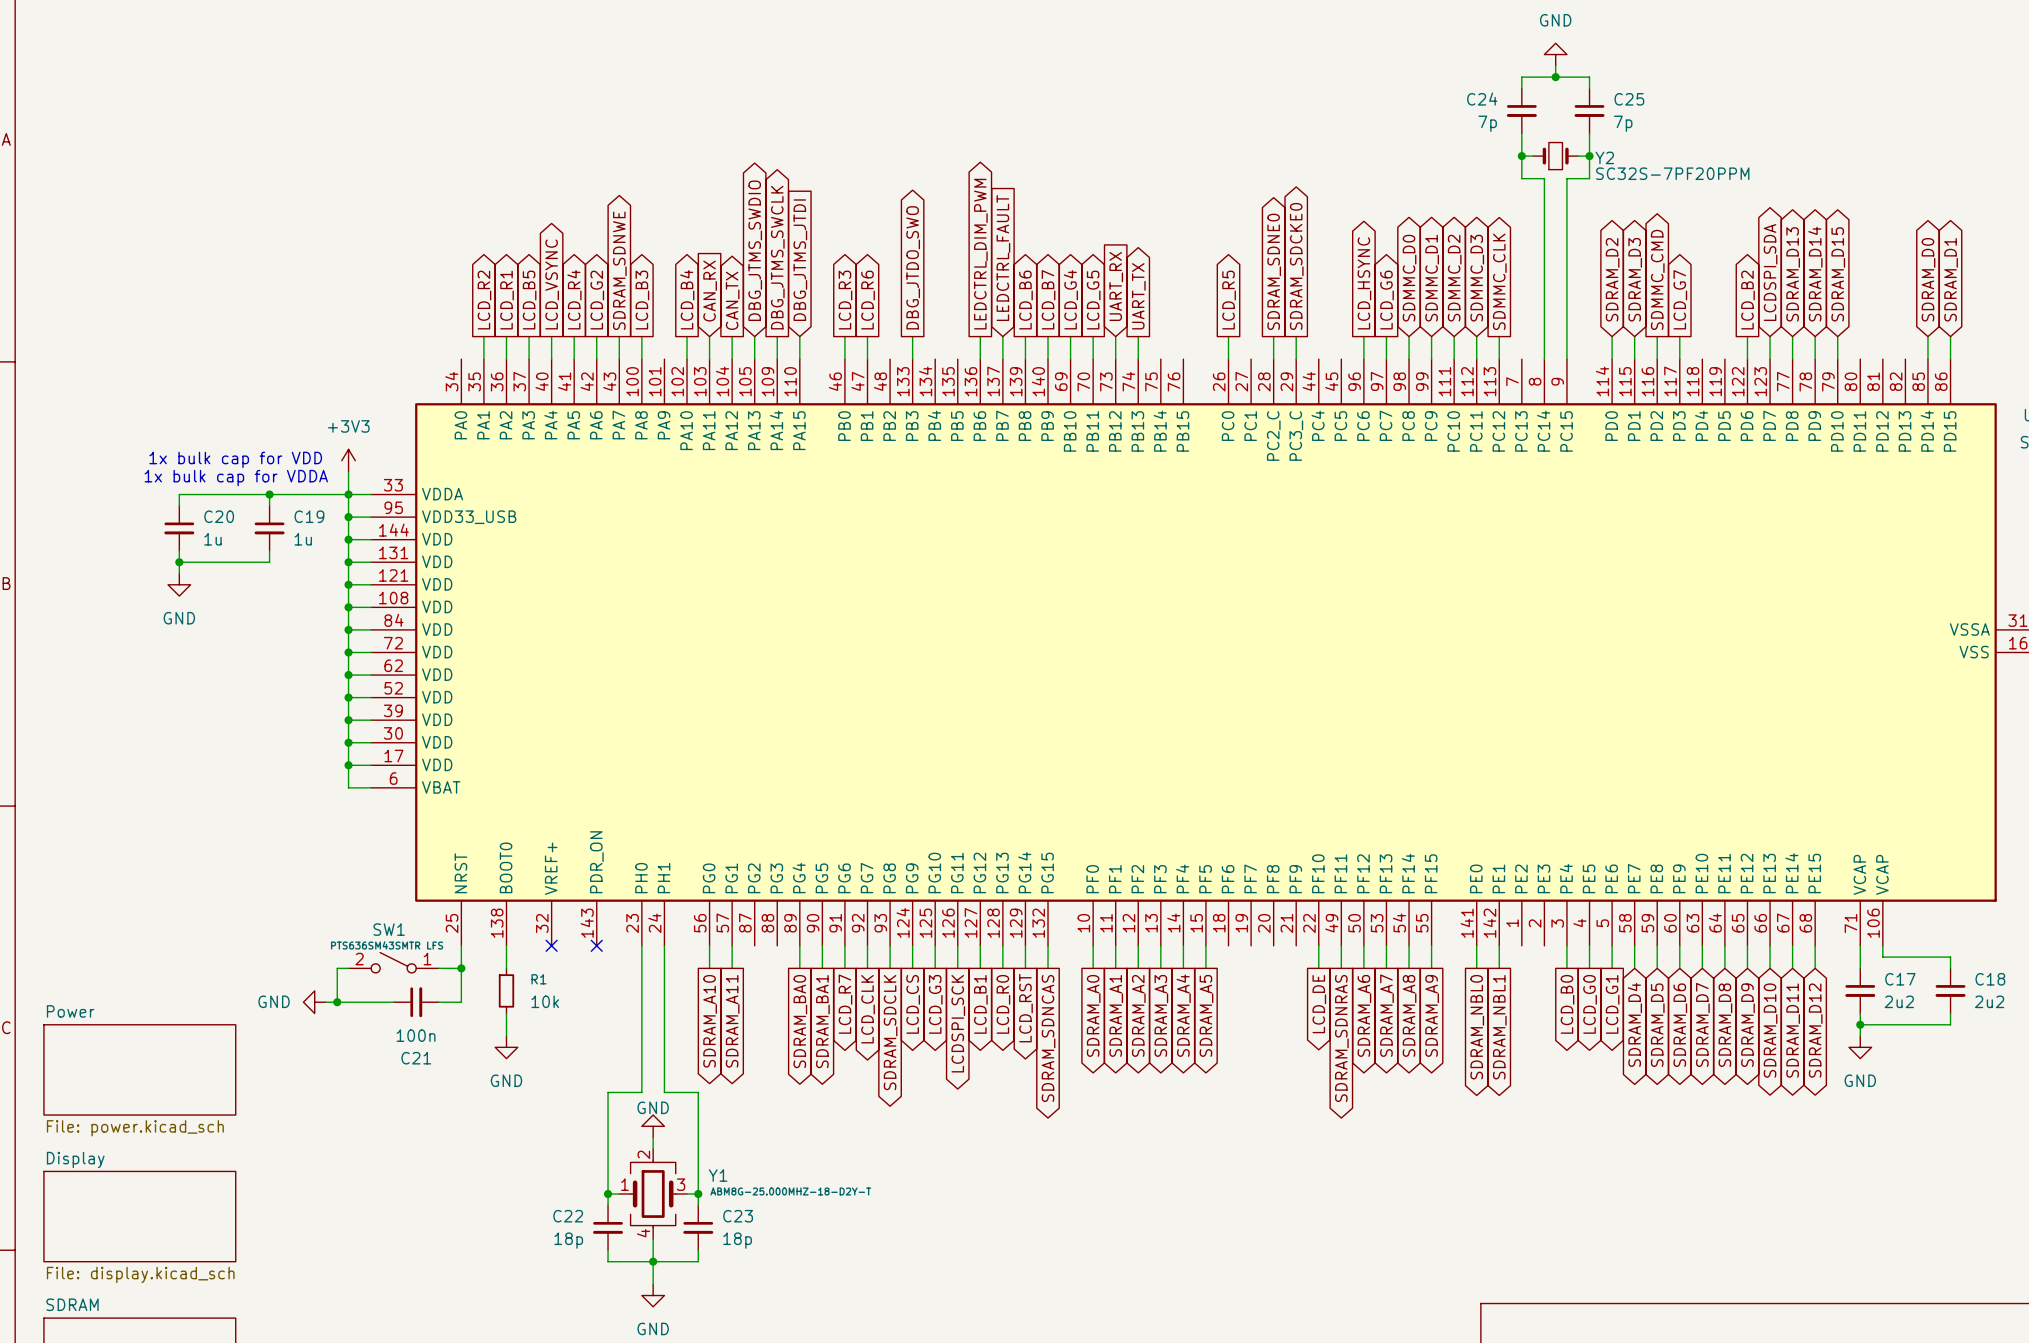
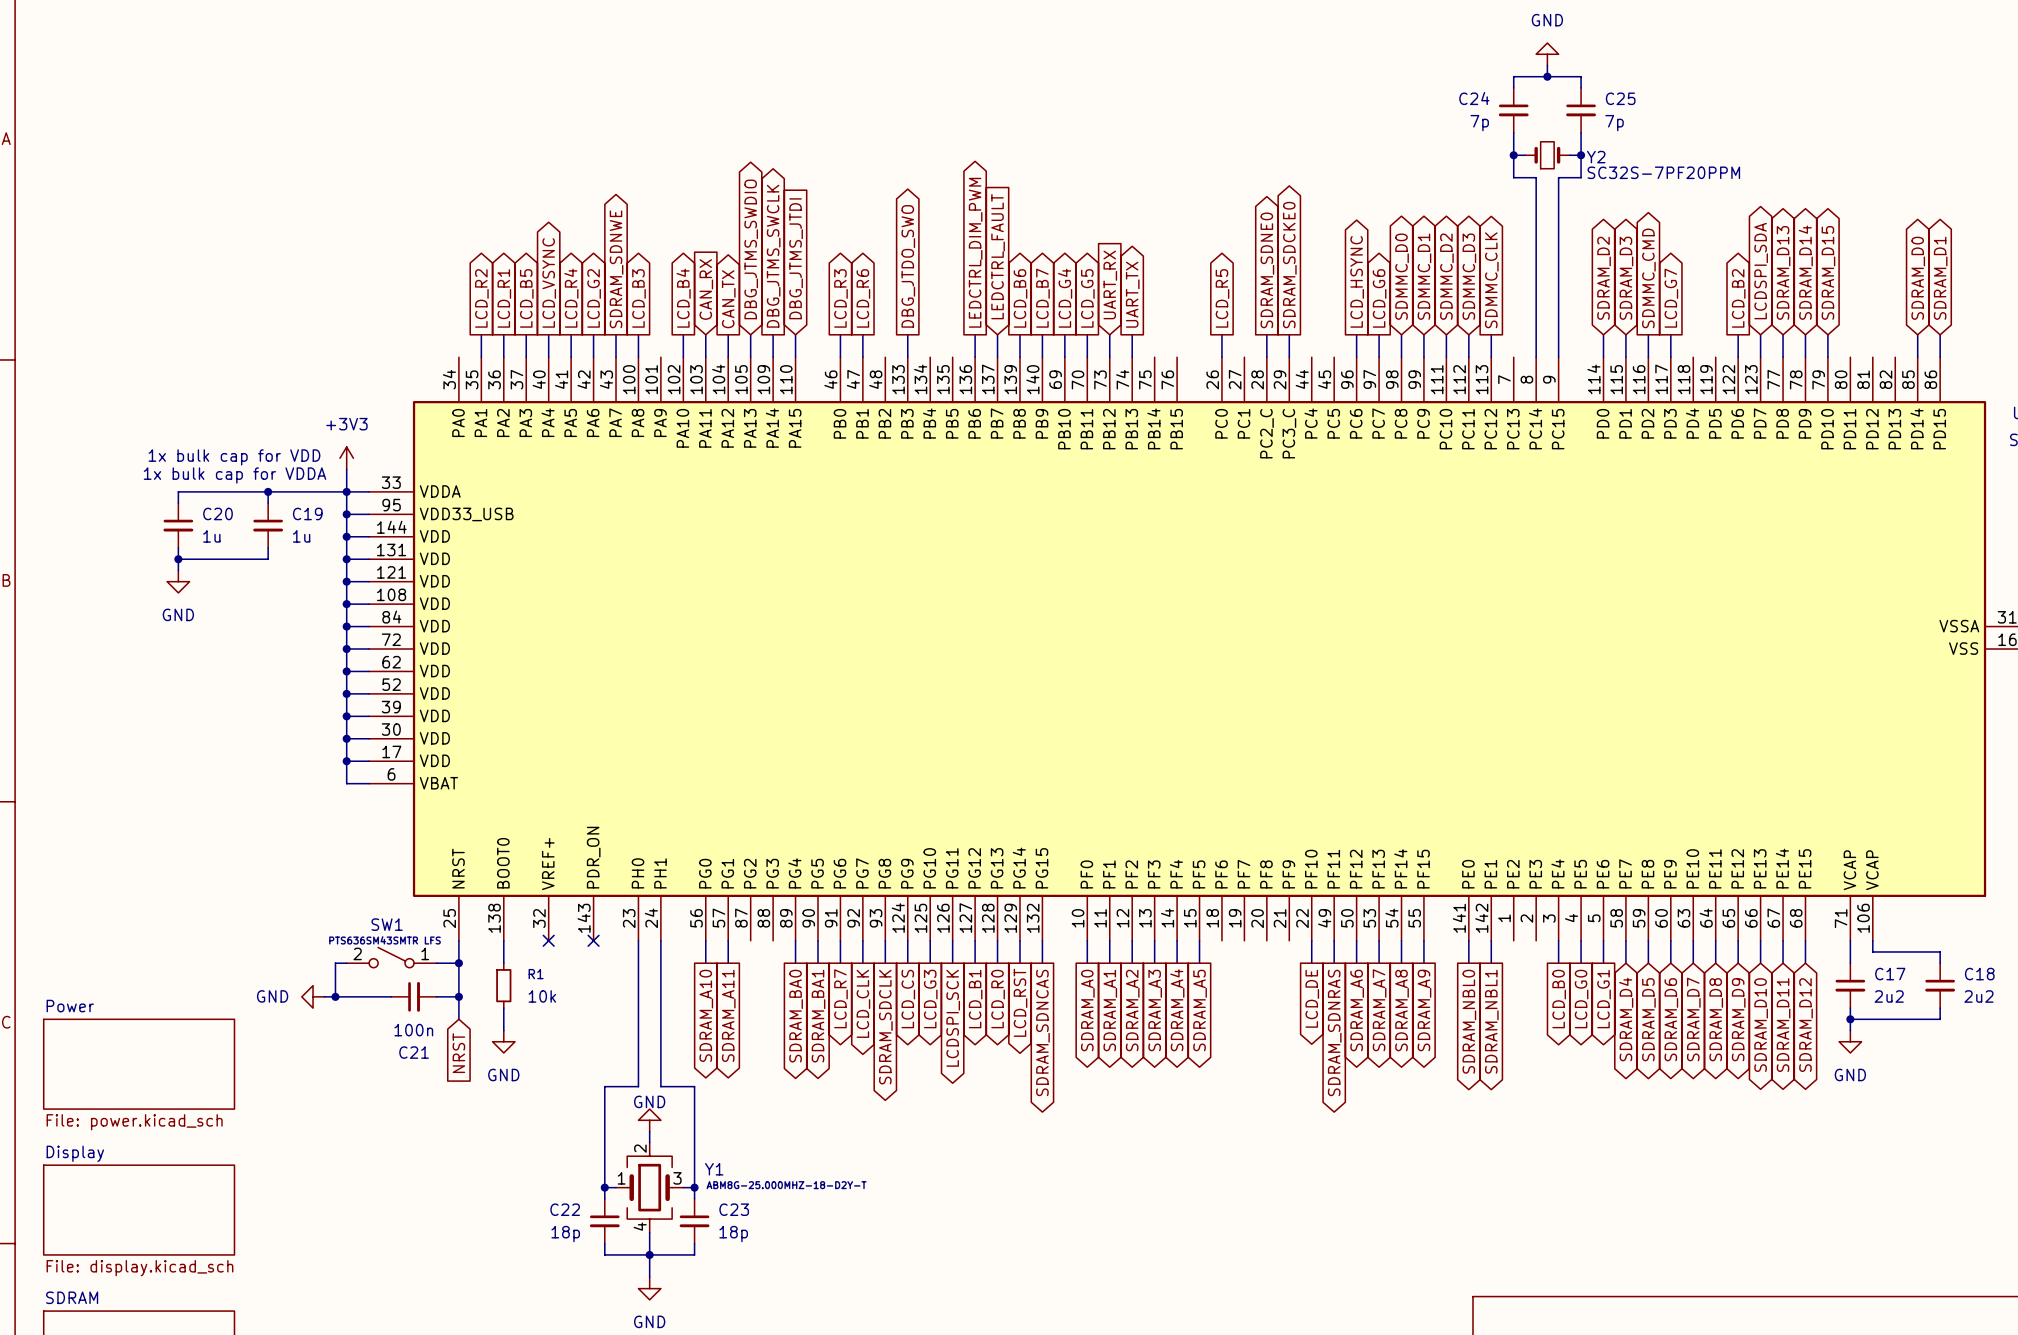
wire: none -> (458, 996) (458, 1019)
junction: none -> (458, 996)
global label: none -> NRST (458, 1053)

